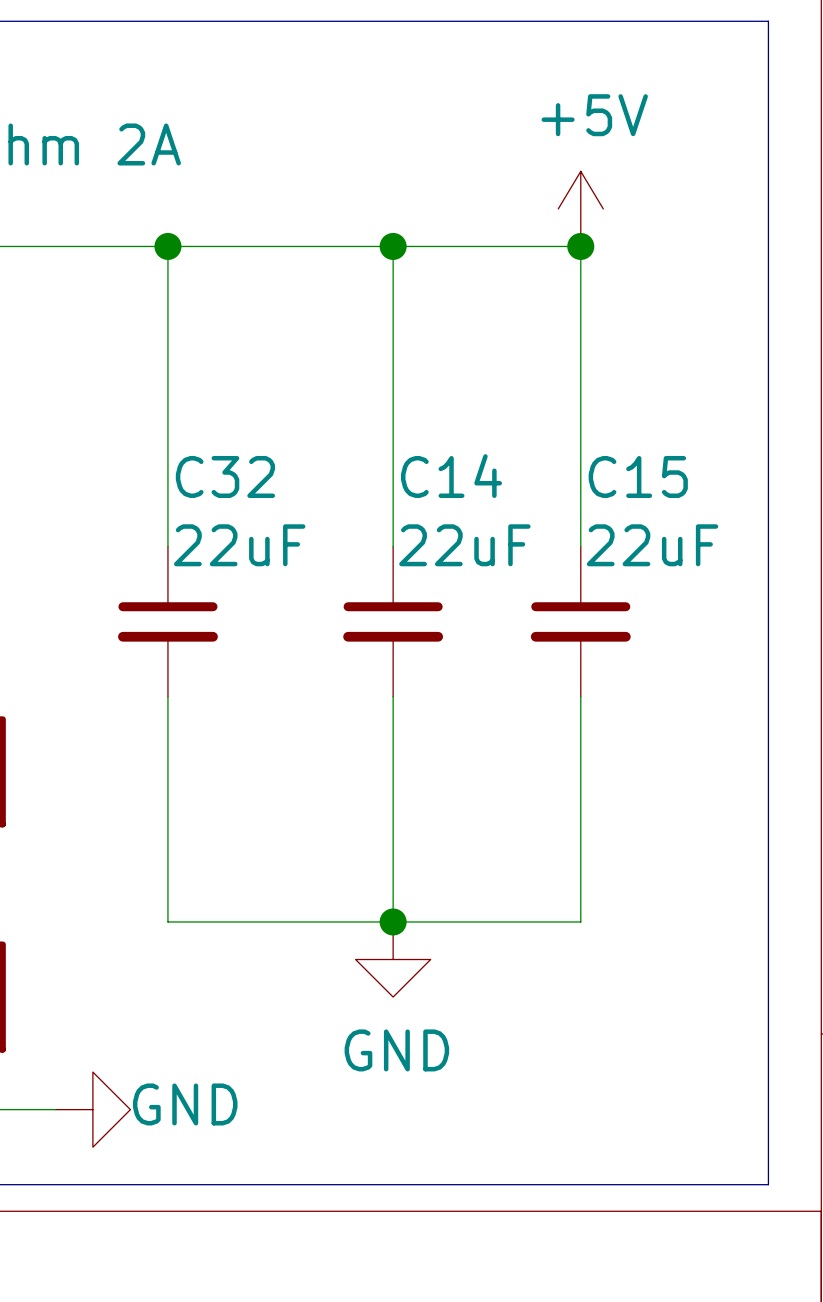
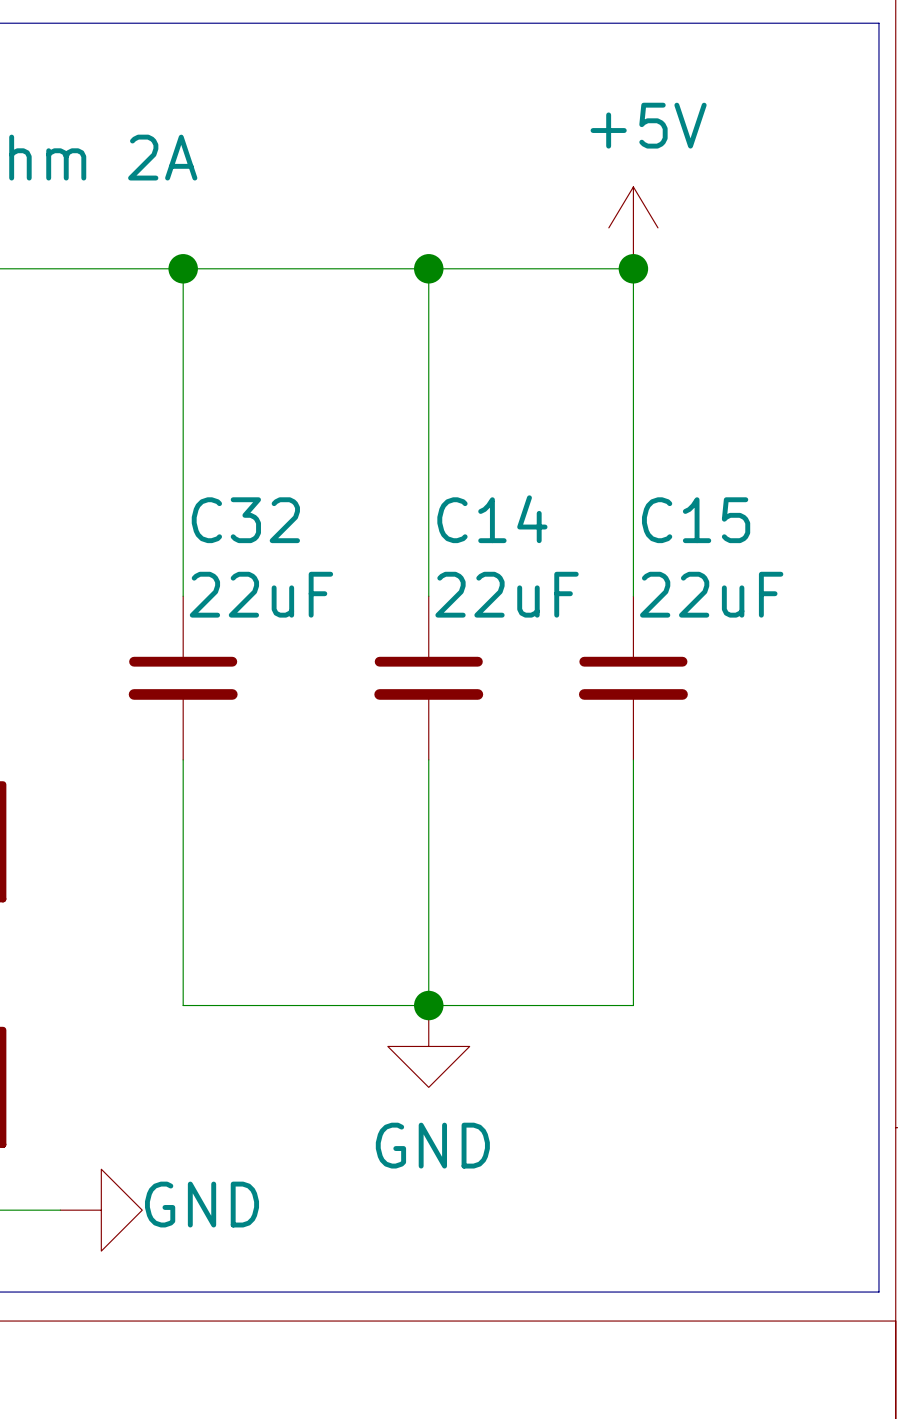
line: (768, 21) (768, 1184) -> (838, 23) (878, 23) (878, 1292) (838, 1292)

